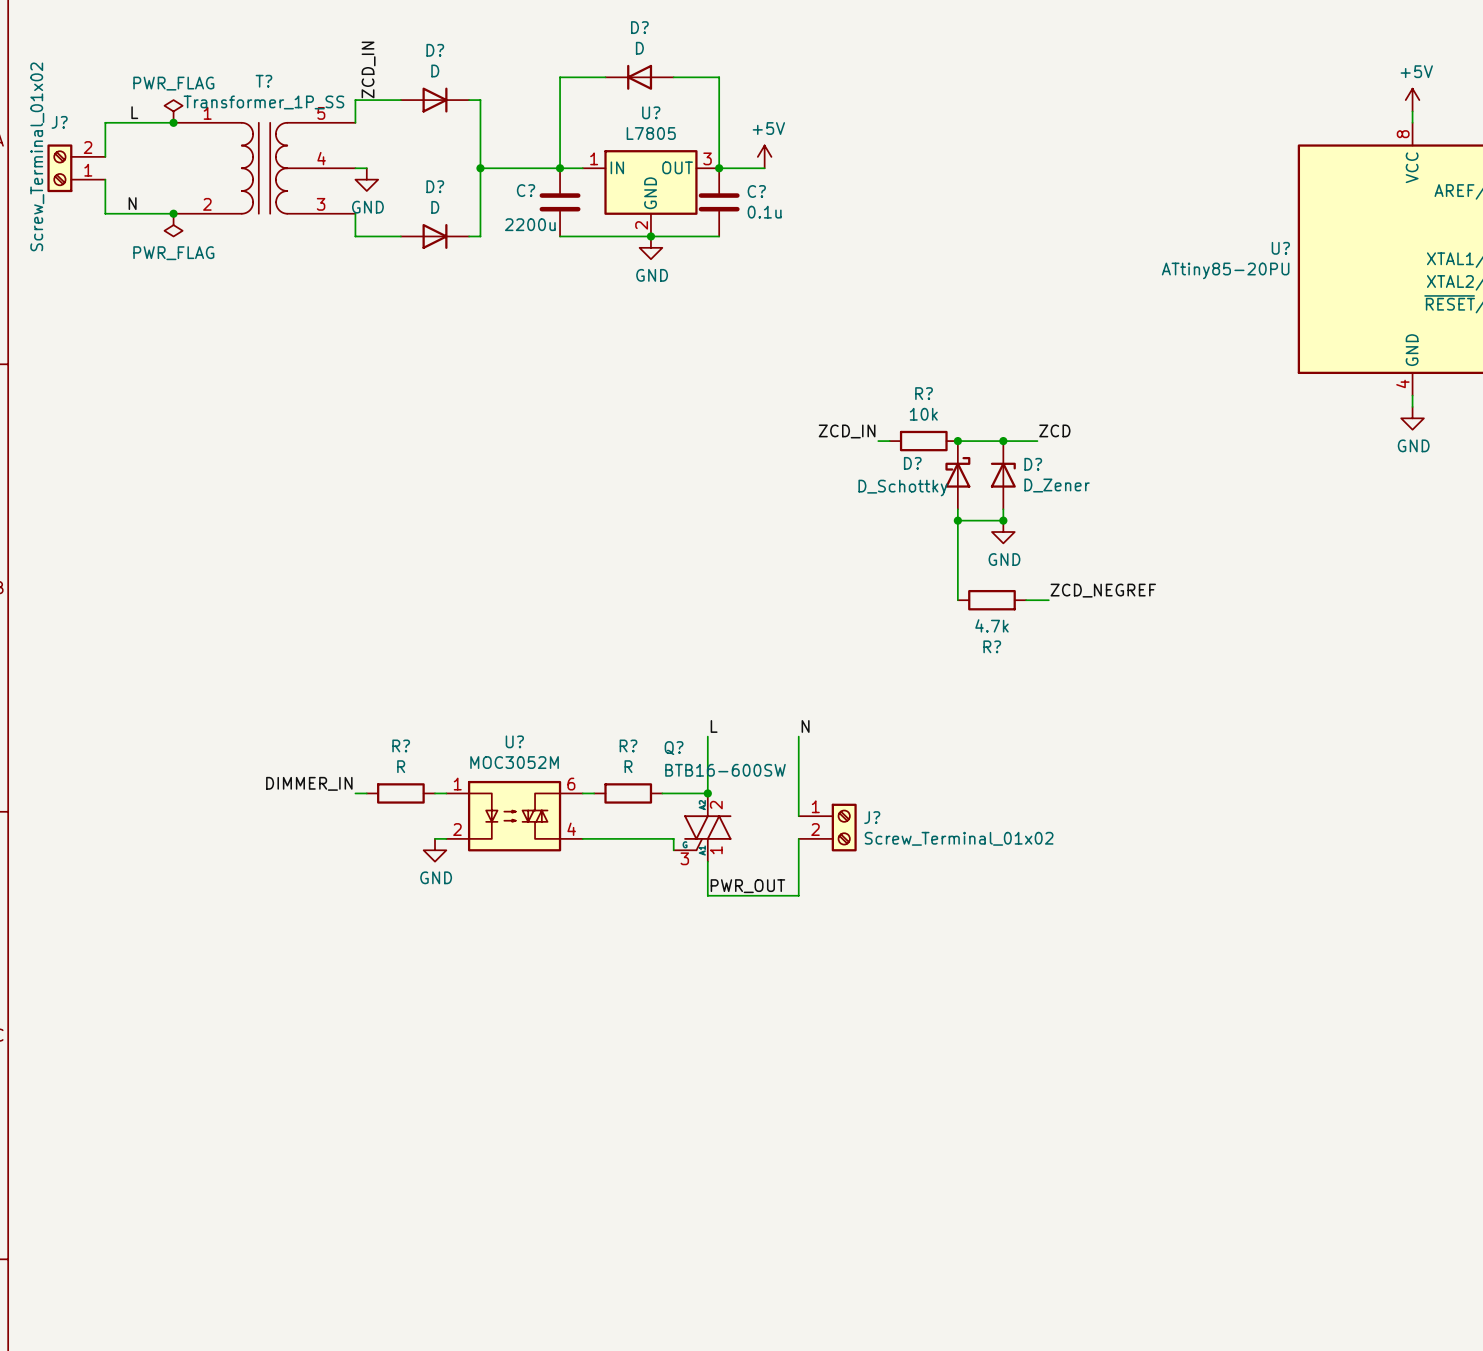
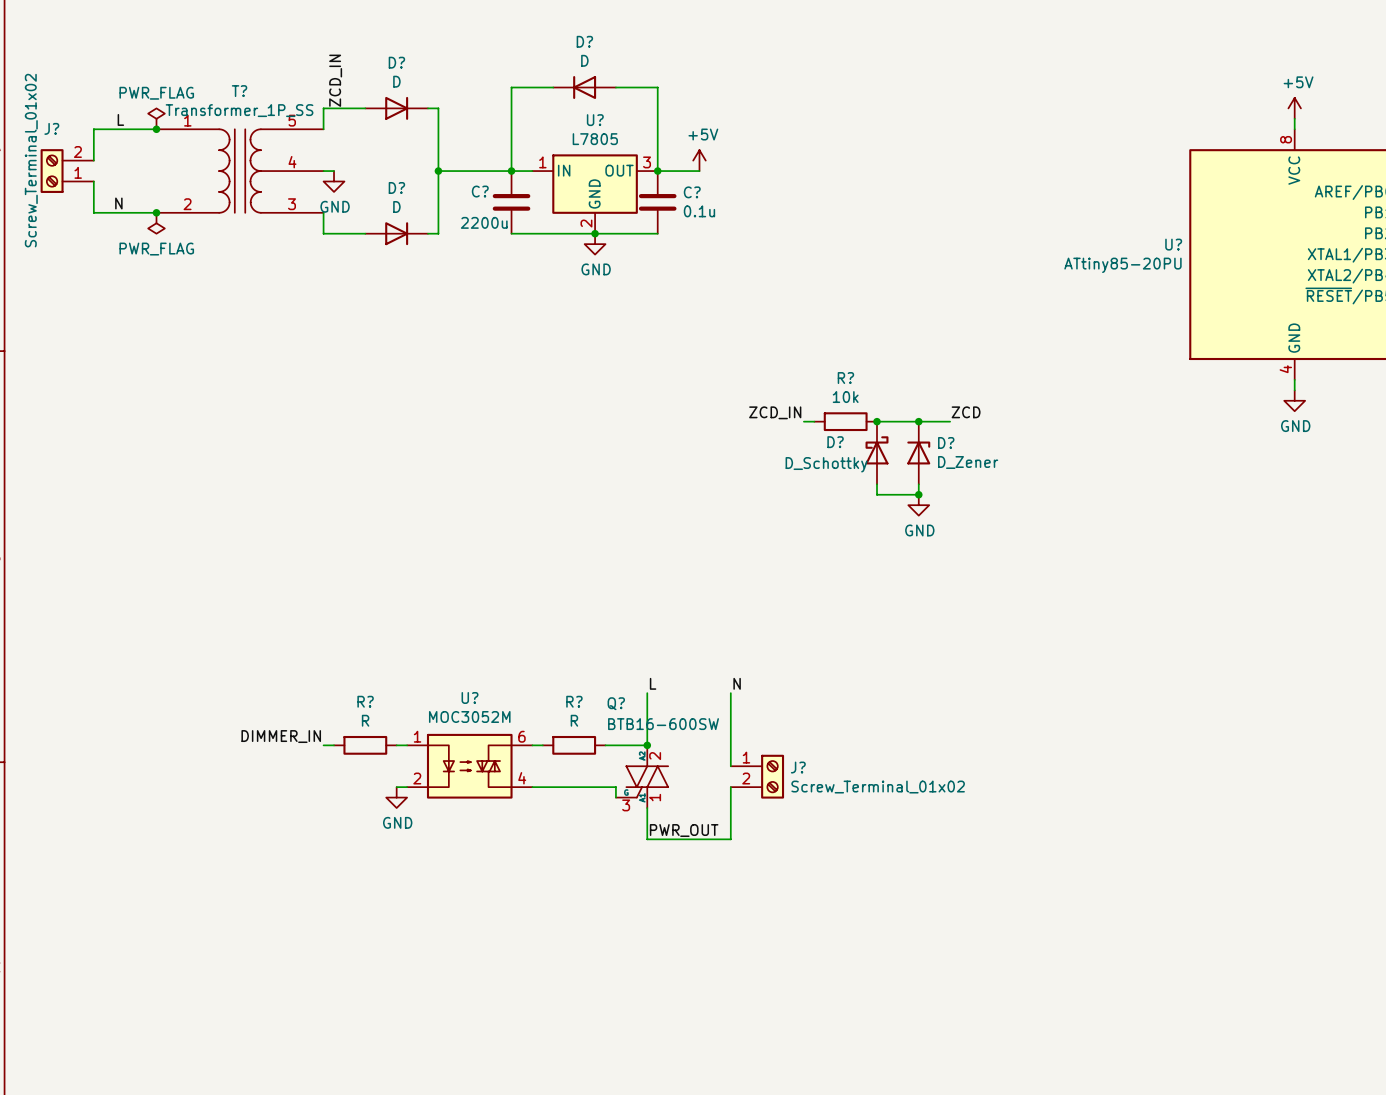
wire: (957, 520) (957, 600) -> none
junction: (957, 520) -> none
label: ZCD_NEGREF (1103, 590) -> none
R?: 4.7k (991, 600) -> none
wire: (1026, 600) (1048, 600) -> none

